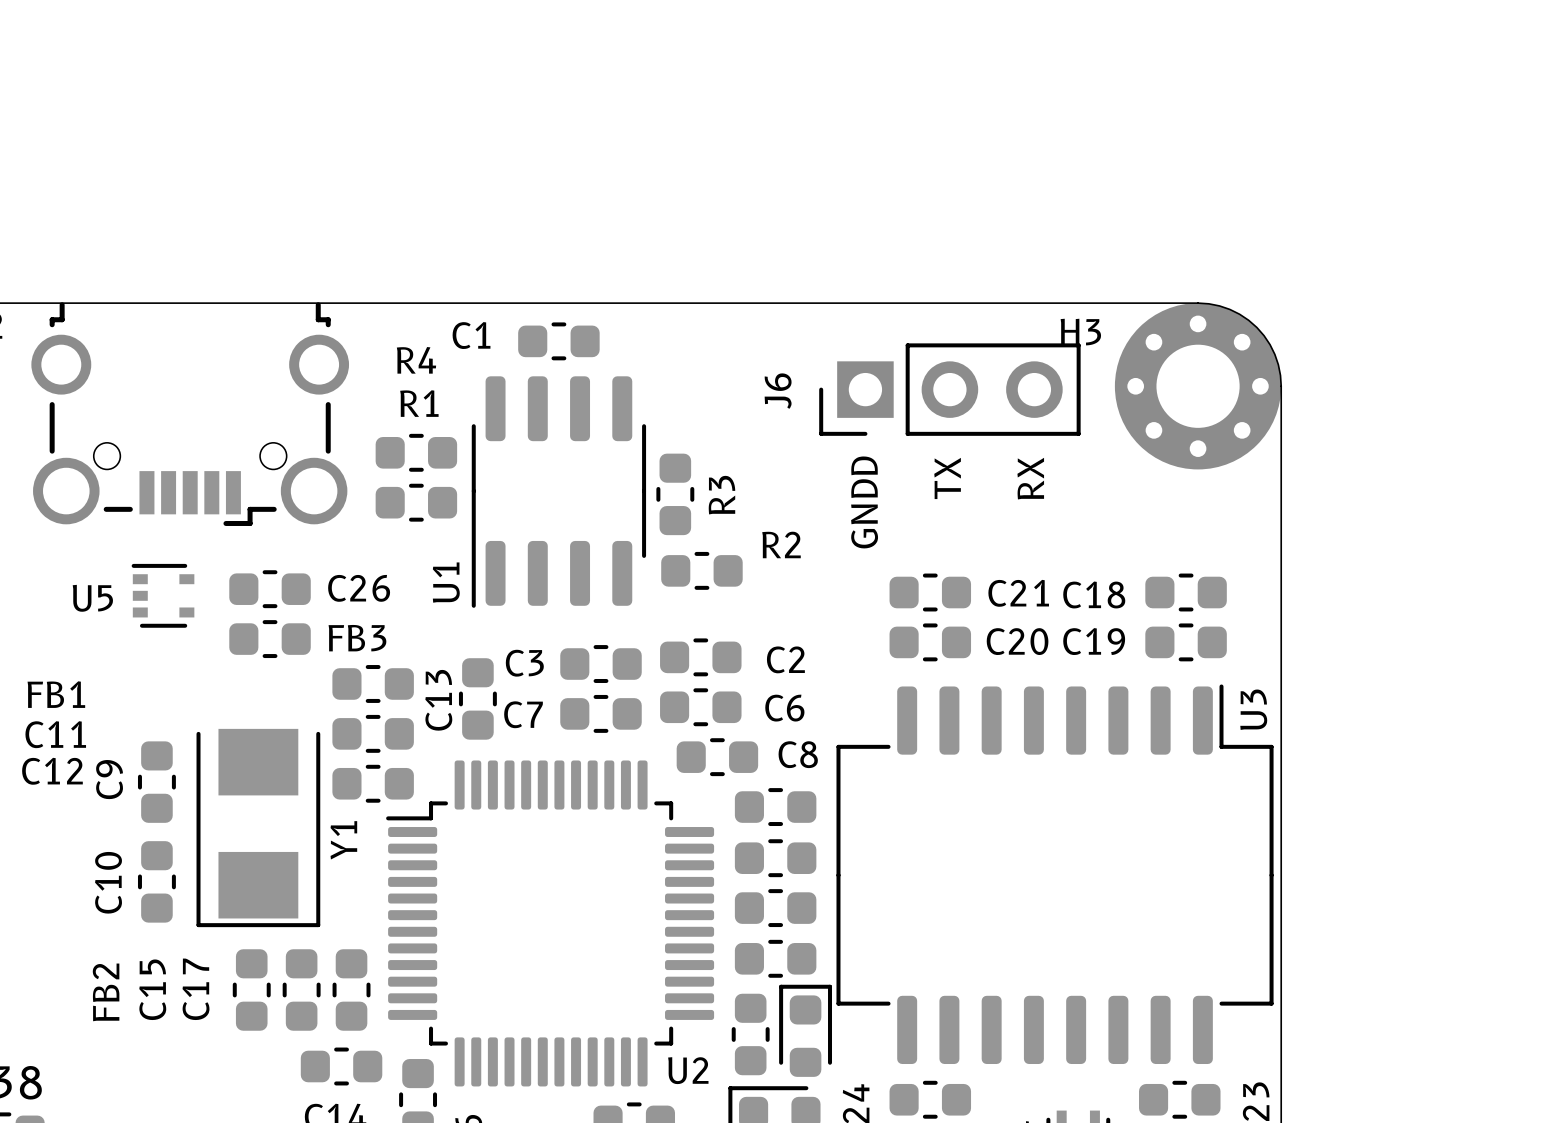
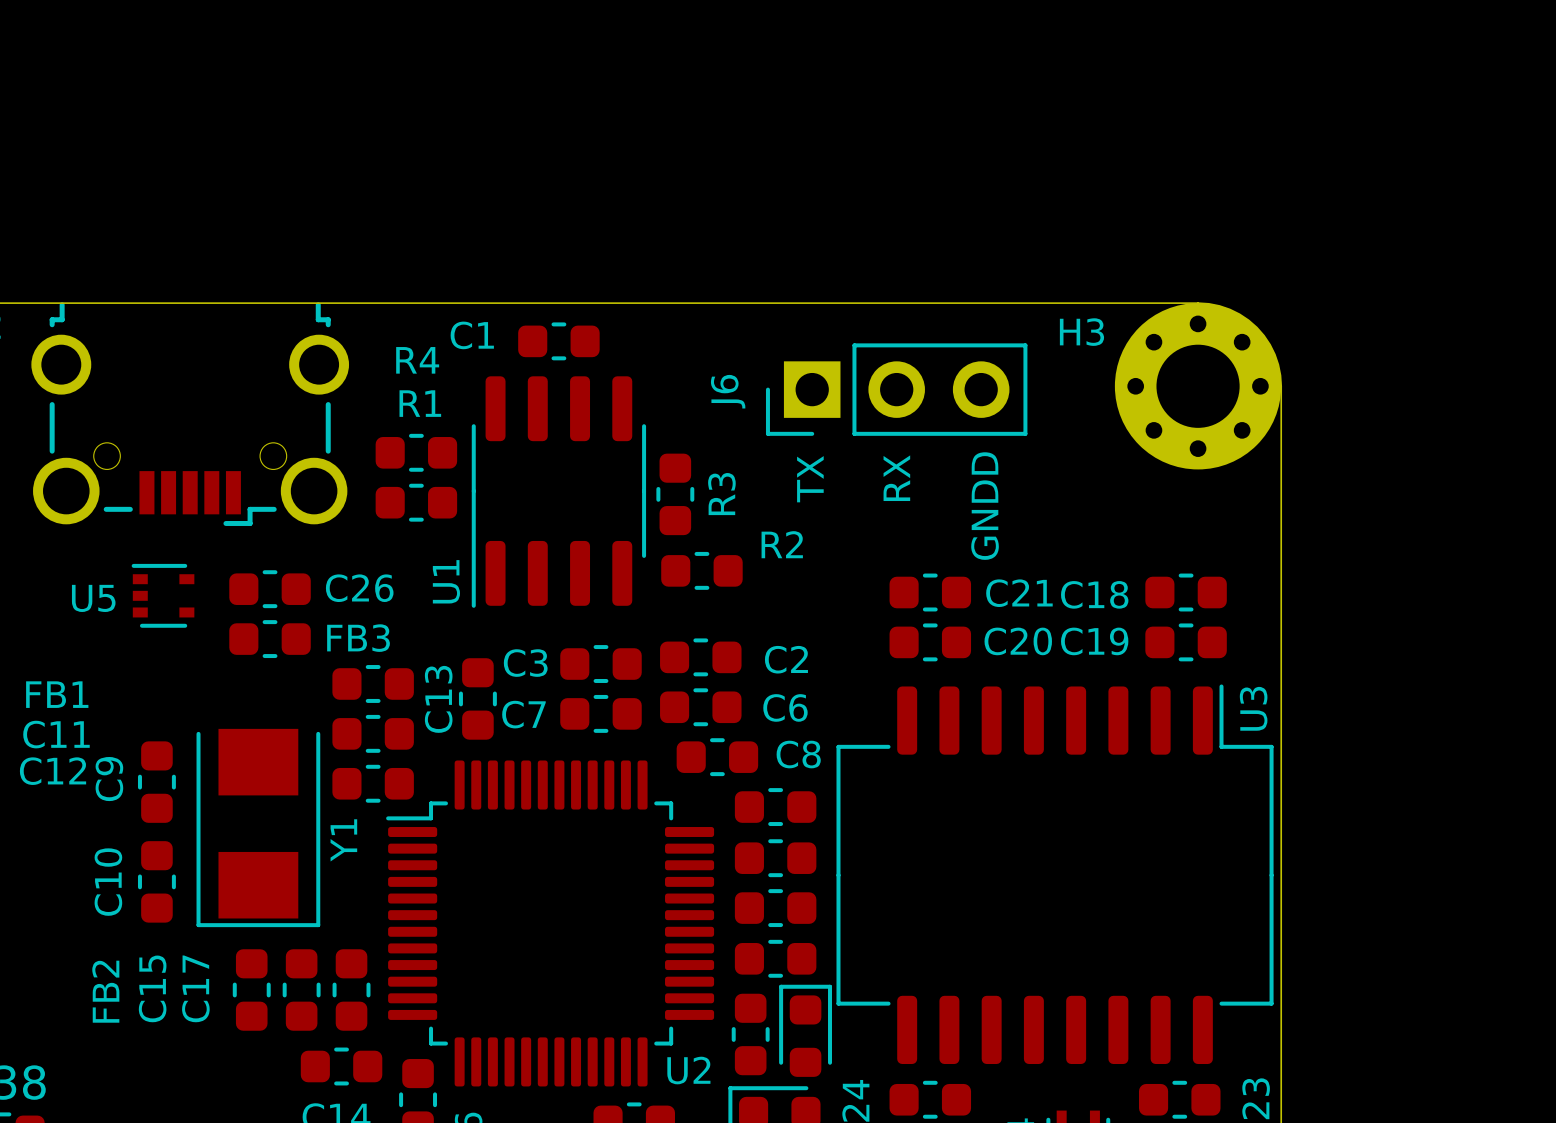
J6 position: (949, 389) -> (896, 389)
text position: TX (947, 478) -> TX (810, 479)
text position: RX (1030, 478) -> RX (896, 478)
text position: GNDD (864, 502) -> GNDD (985, 506)

